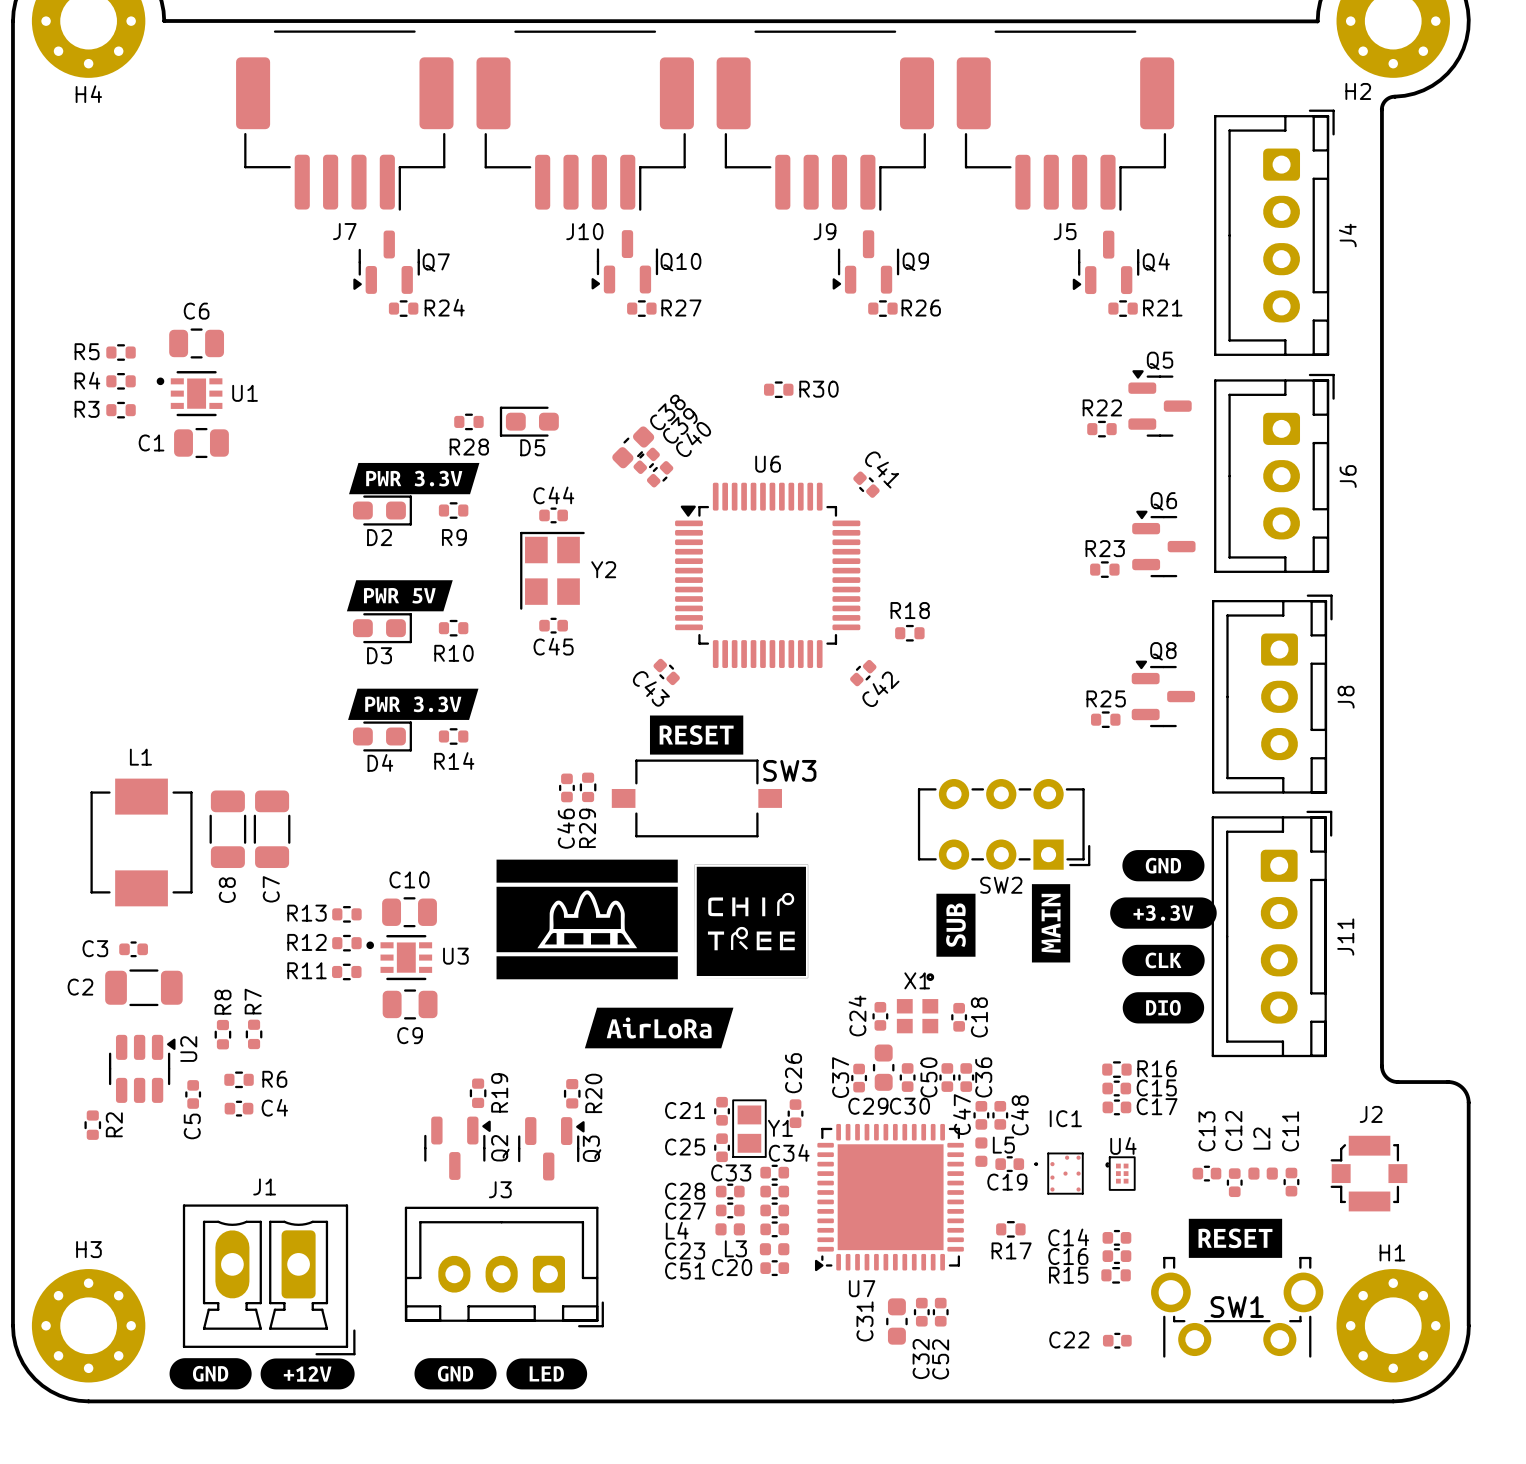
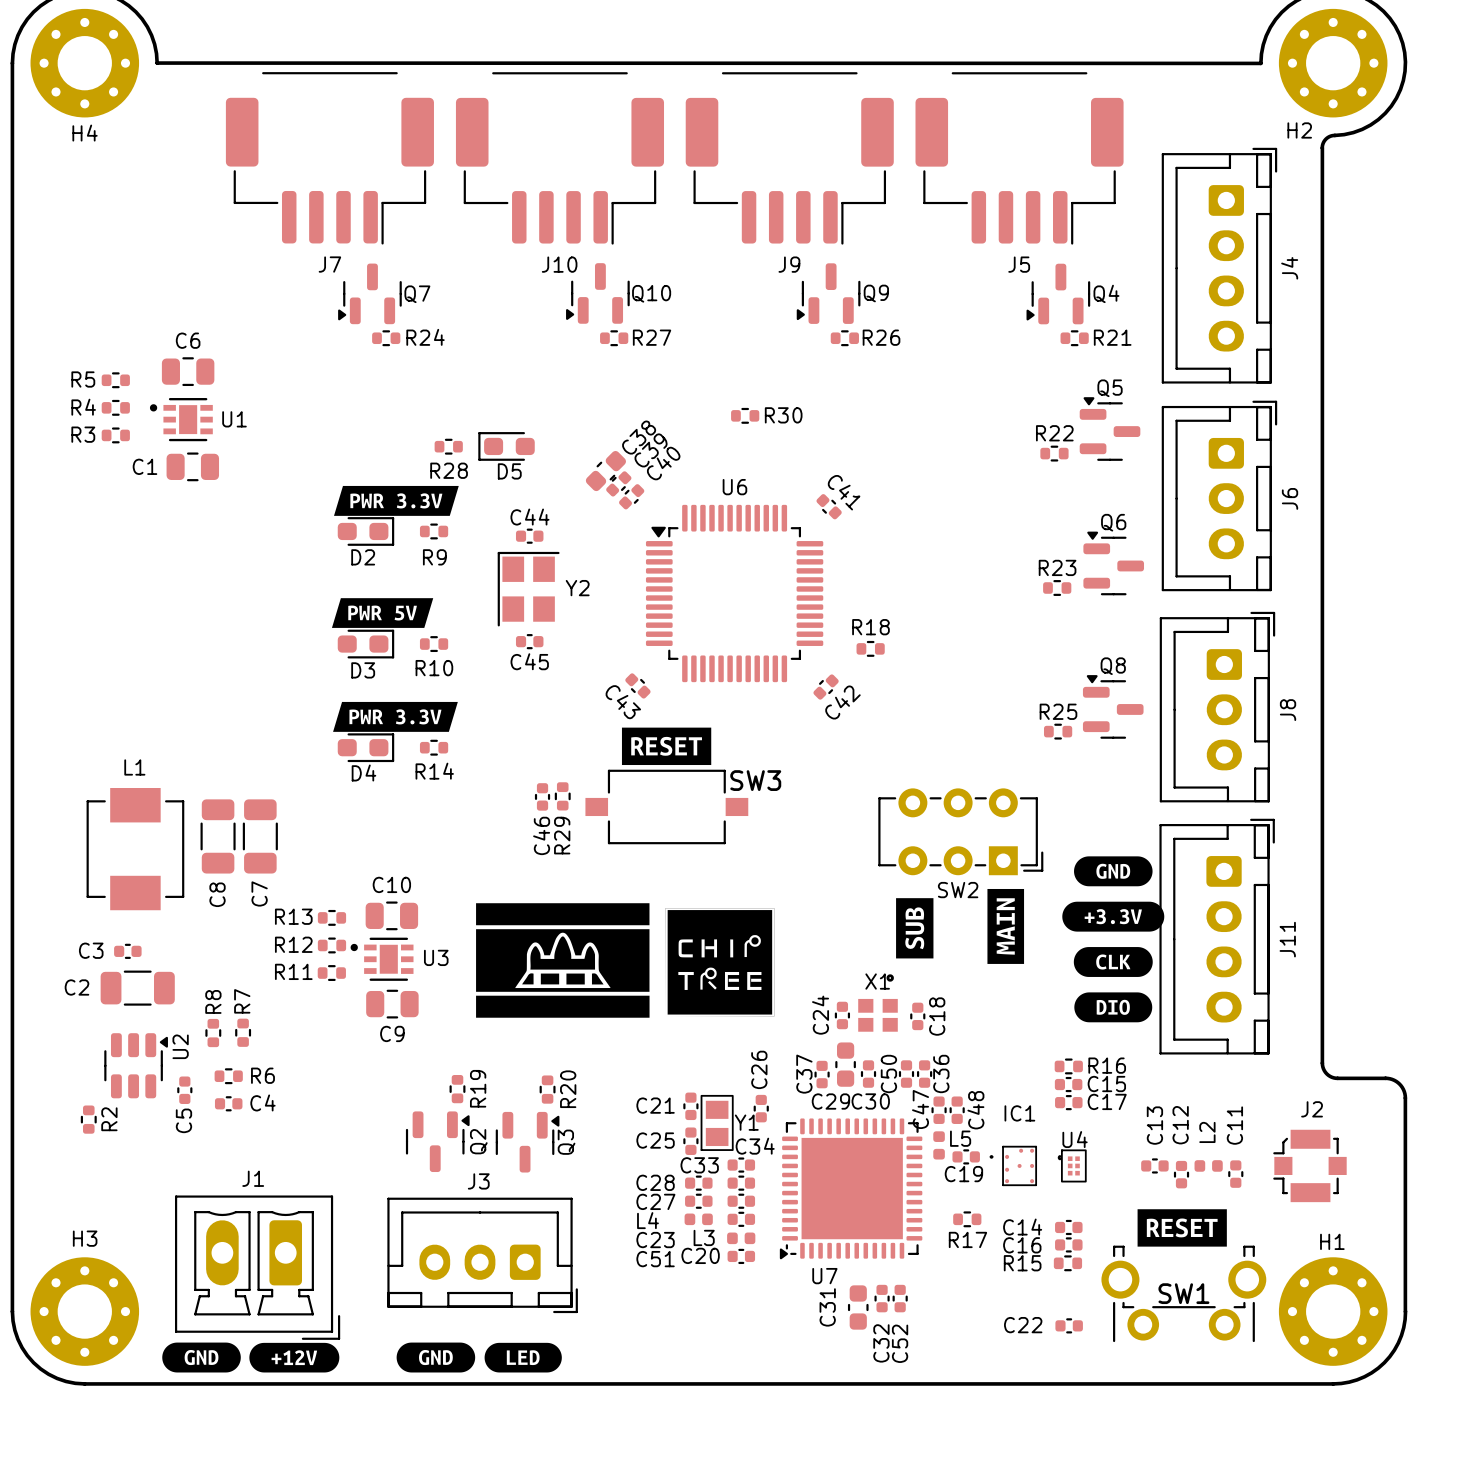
drawing position: (587, 919) -> (562, 960)
drawing position: (751, 921) -> (719, 962)
drawing: [584, 1007, 734, 1049] -> none

